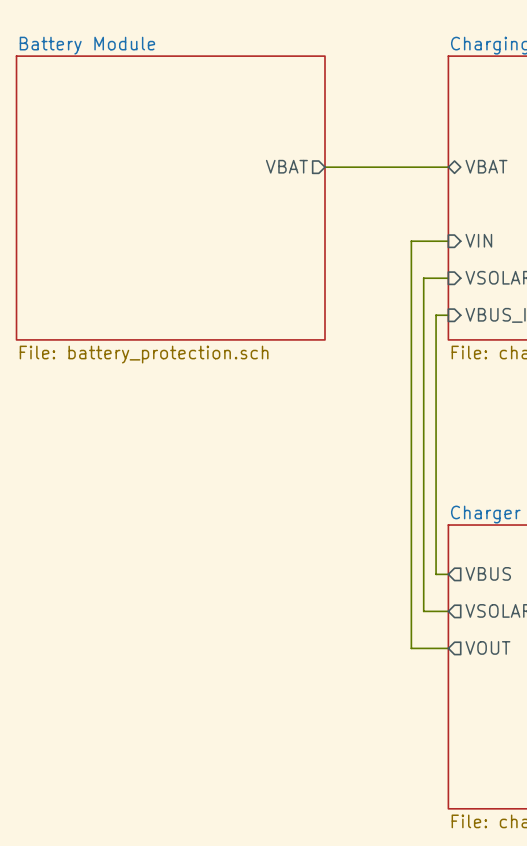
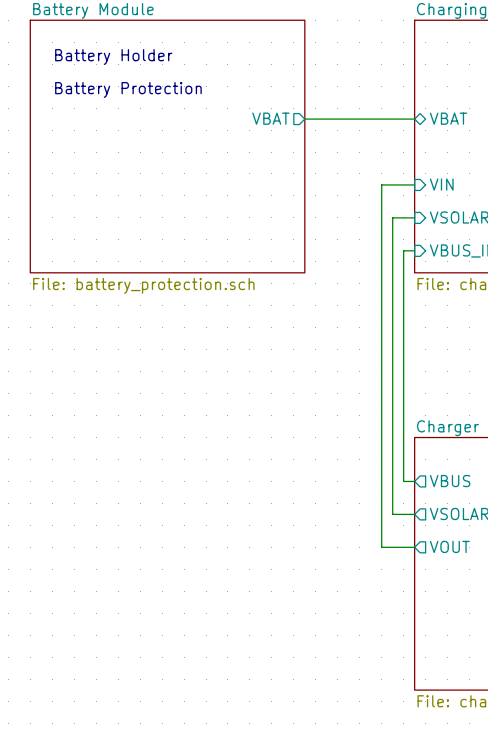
text: none -> Battery Holder (113, 57)
text: none -> Battery Protection (128, 89)

